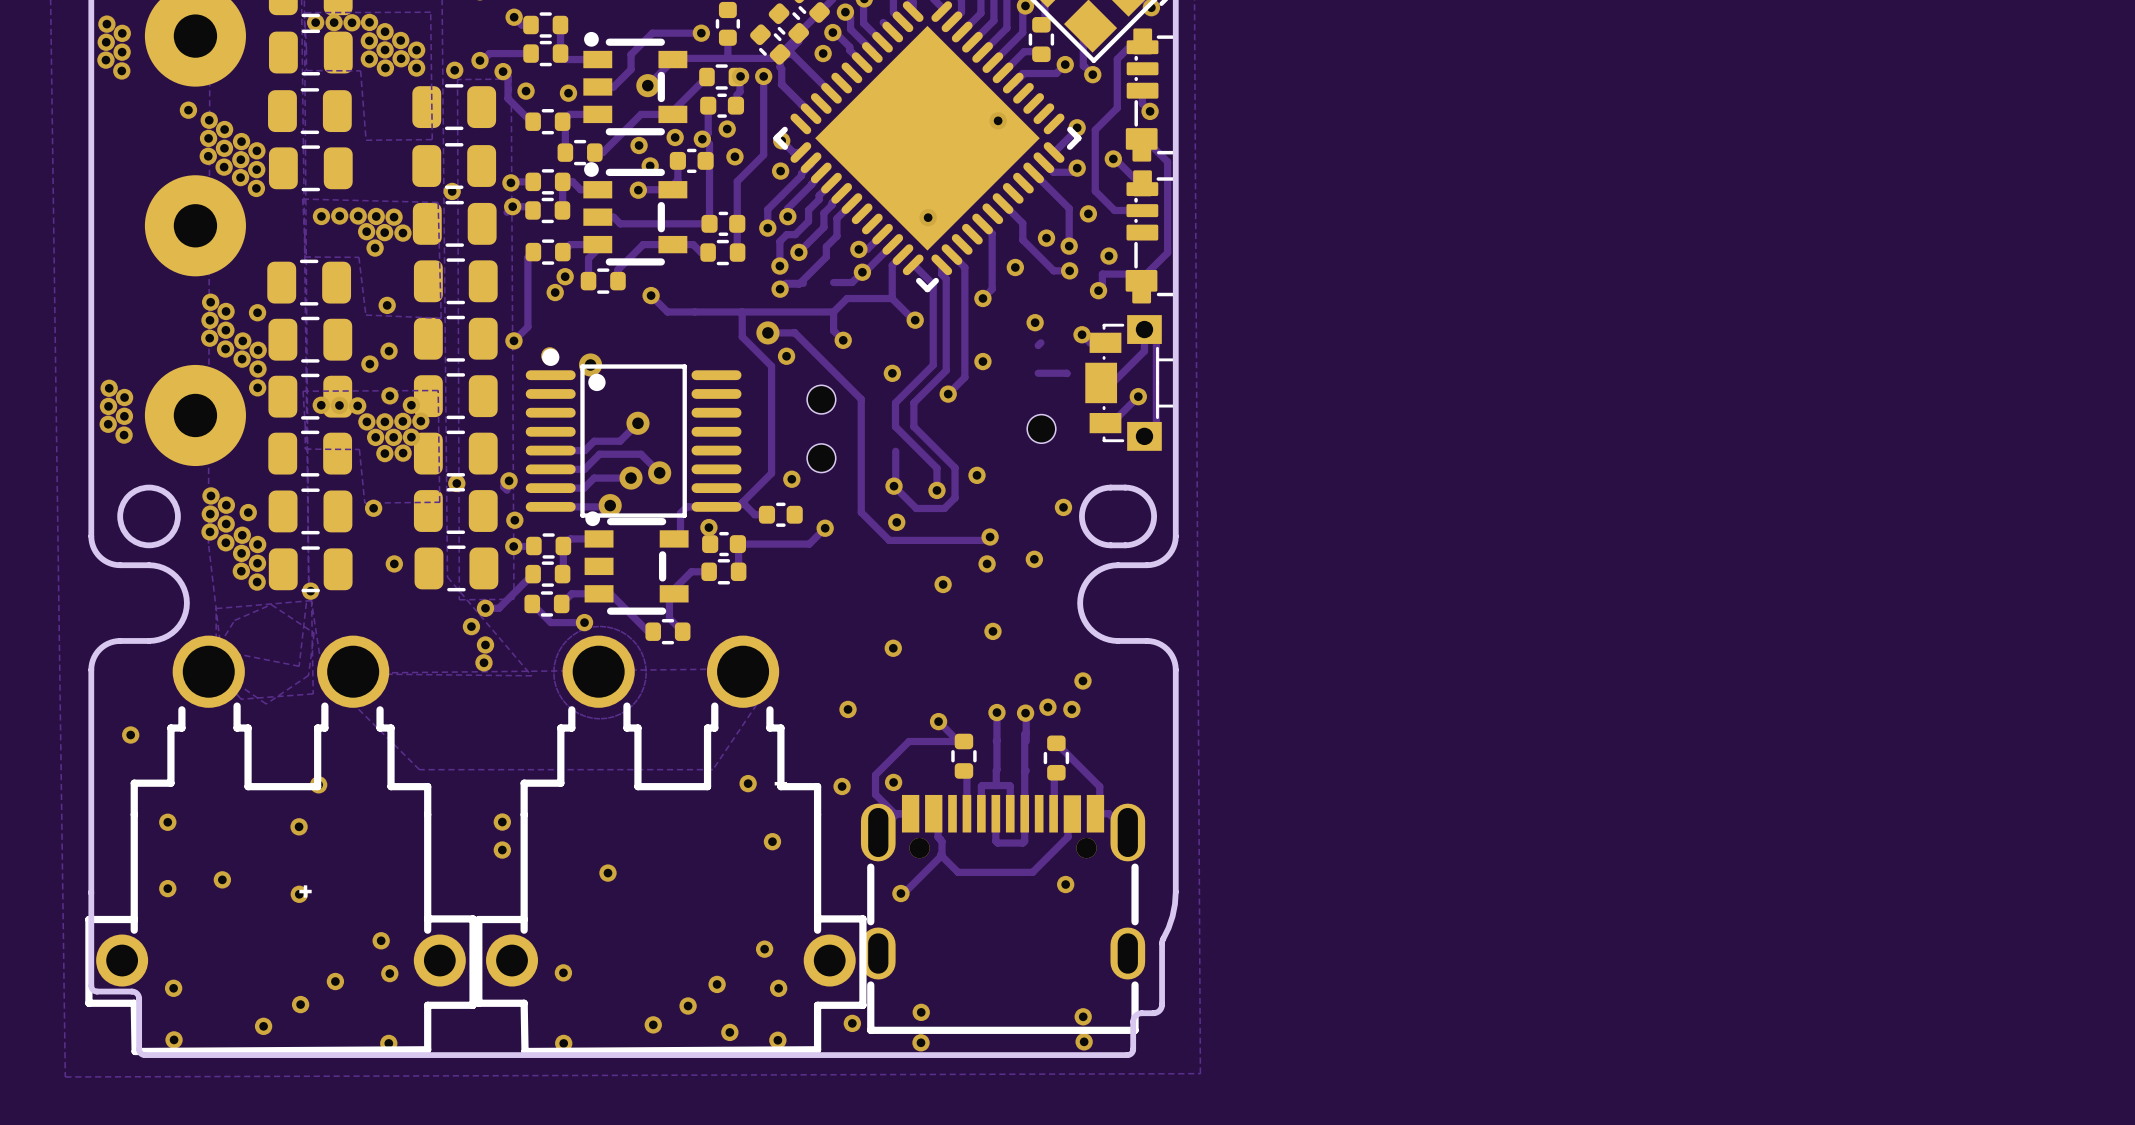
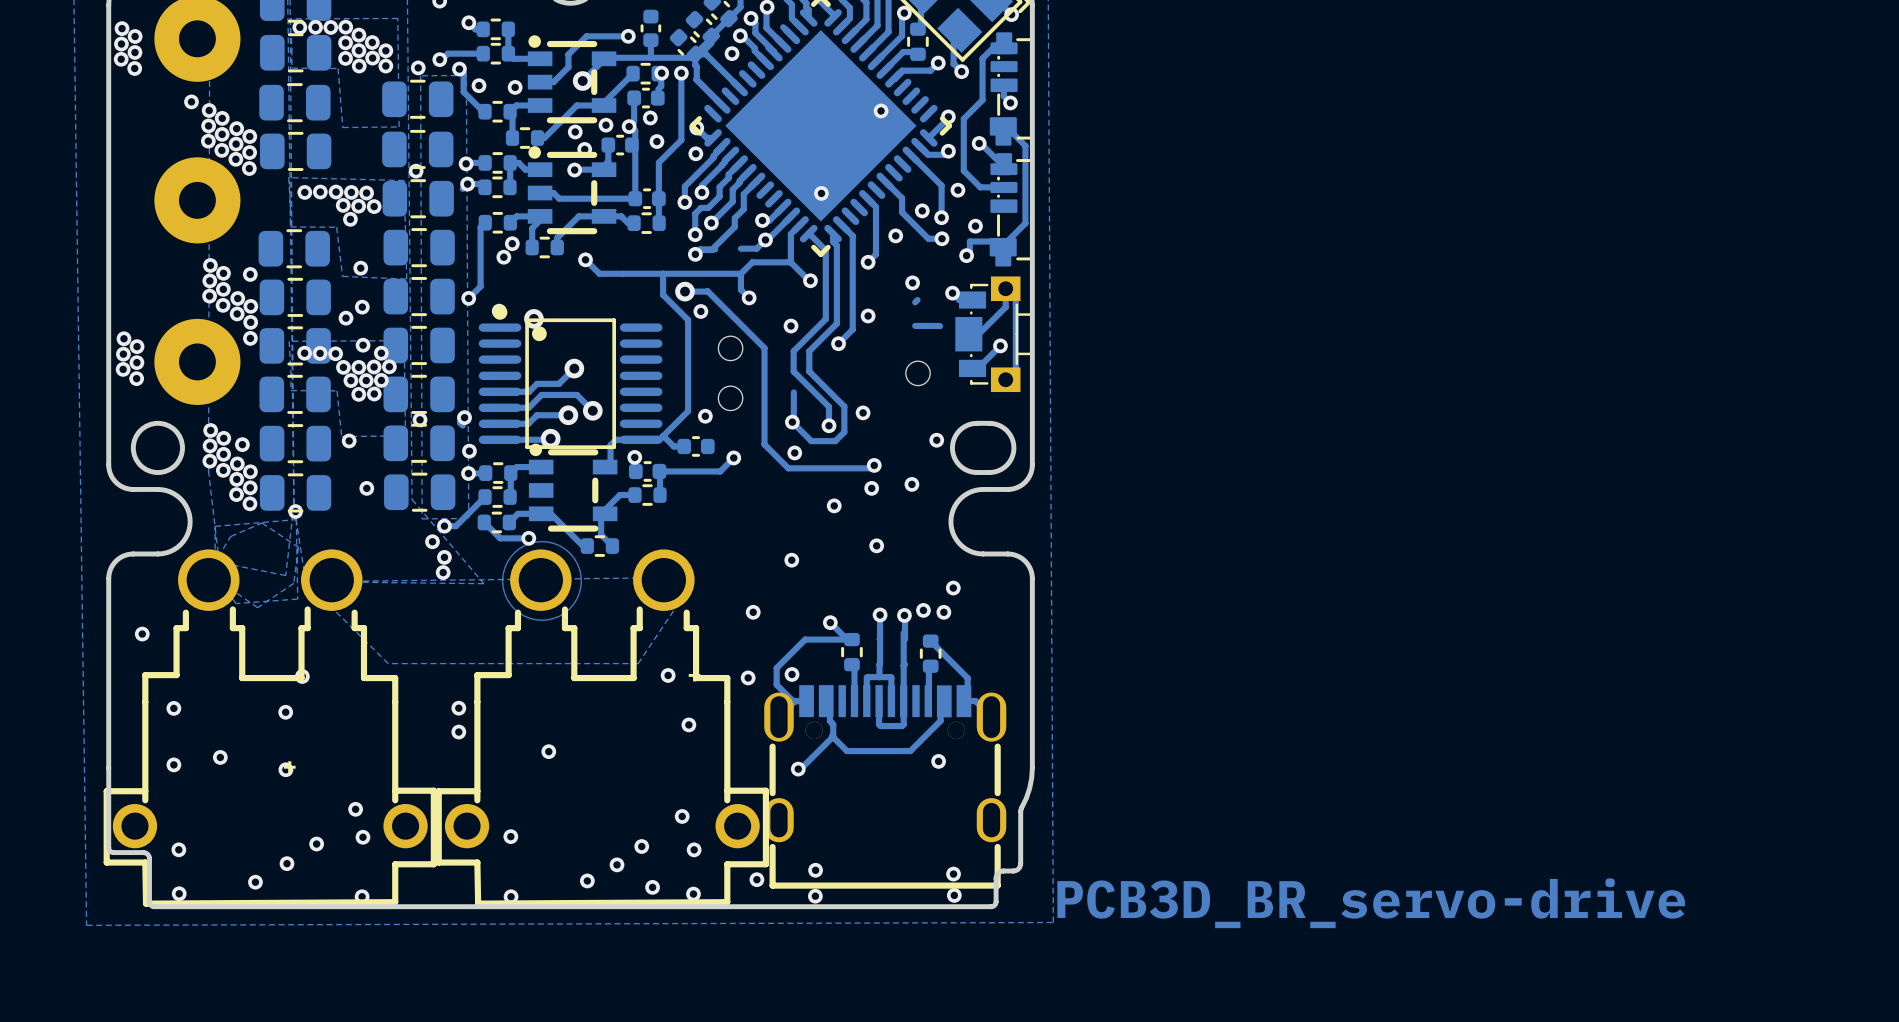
text: none -> PCB3D_BR_servo-drive (1371, 903)

